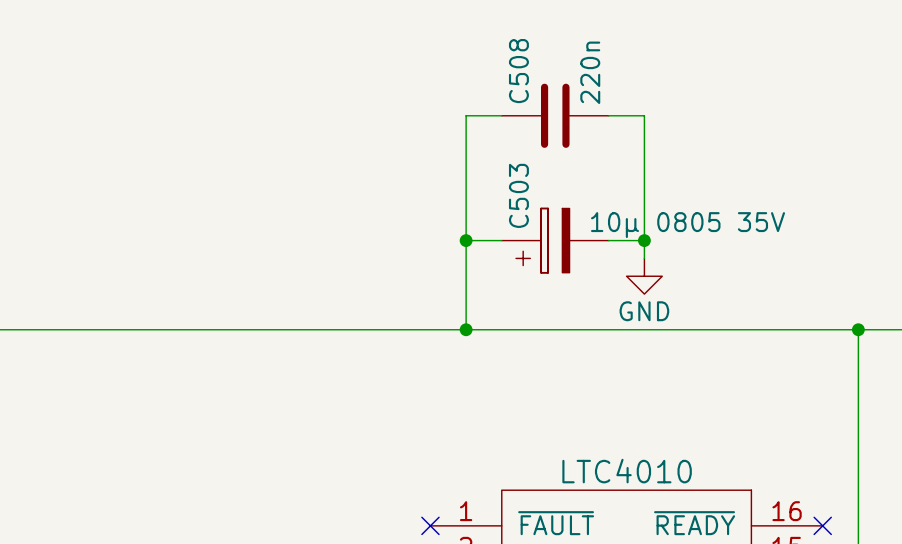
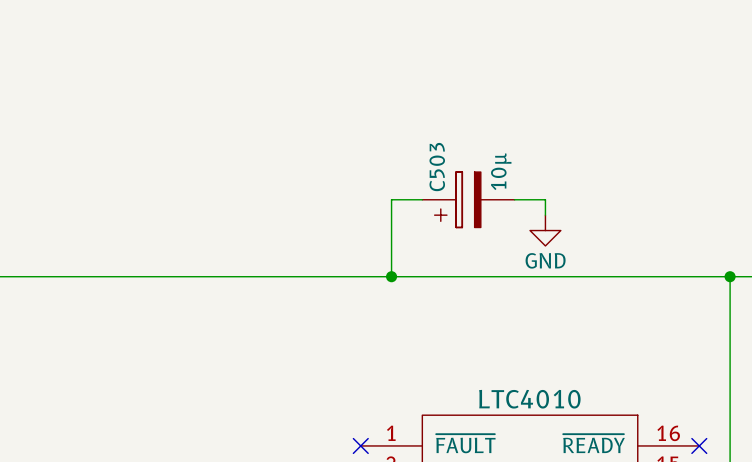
wire: (501, 115) (466, 115) (466, 240) -> none
C508: 220n (555, 115) -> none
wire: (608, 115) (644, 115) (644, 240) -> none
C503 value: 10µ 0805 35V (688, 225) -> 10µ (501, 171)
junction: (466, 240) -> none
junction: (644, 240) -> none

